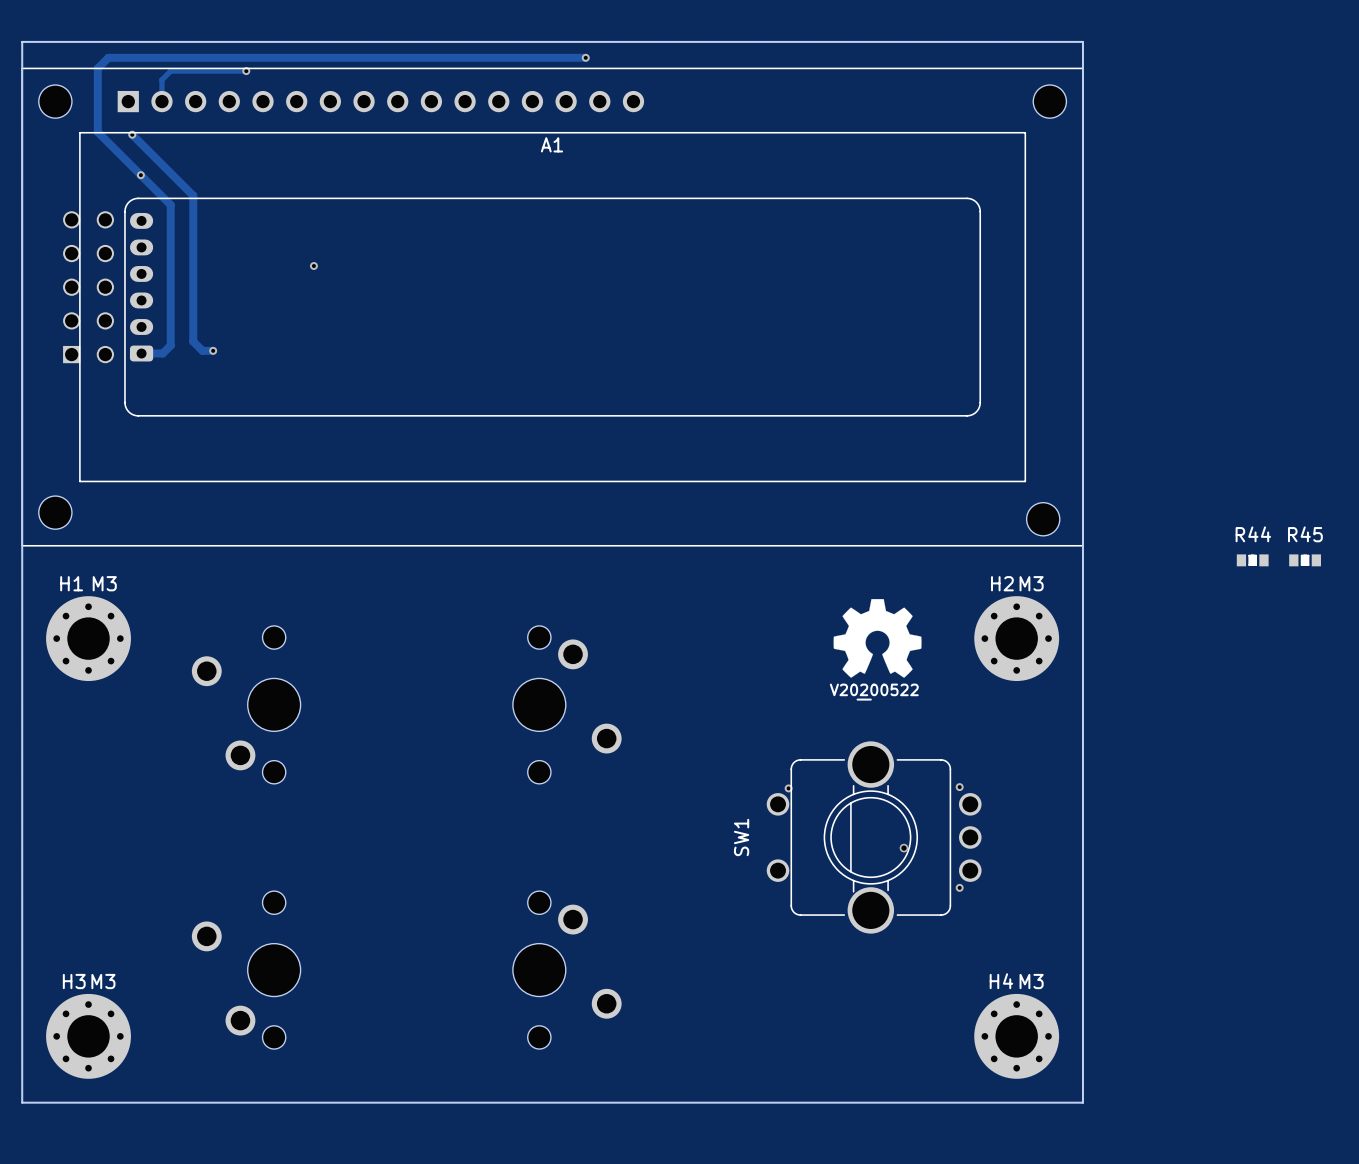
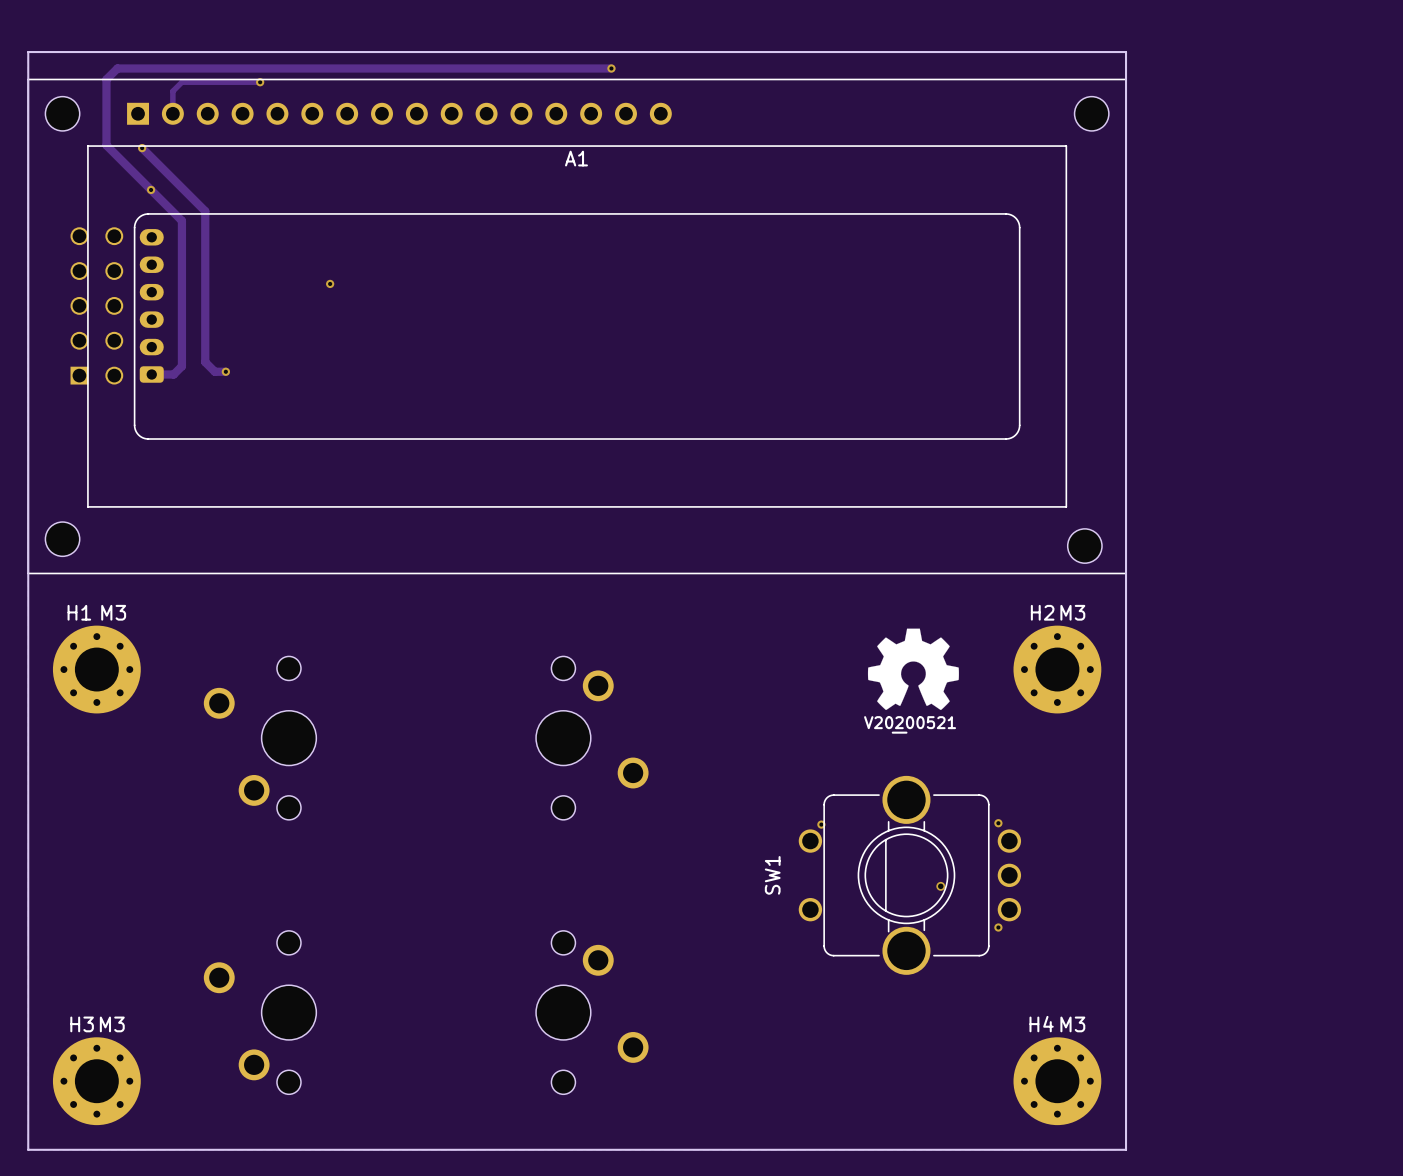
R44: (1252, 560) -> none
R45: (1305, 560) -> none
drawing shape: [829, 683, 919, 701] -> [864, 716, 957, 734]

